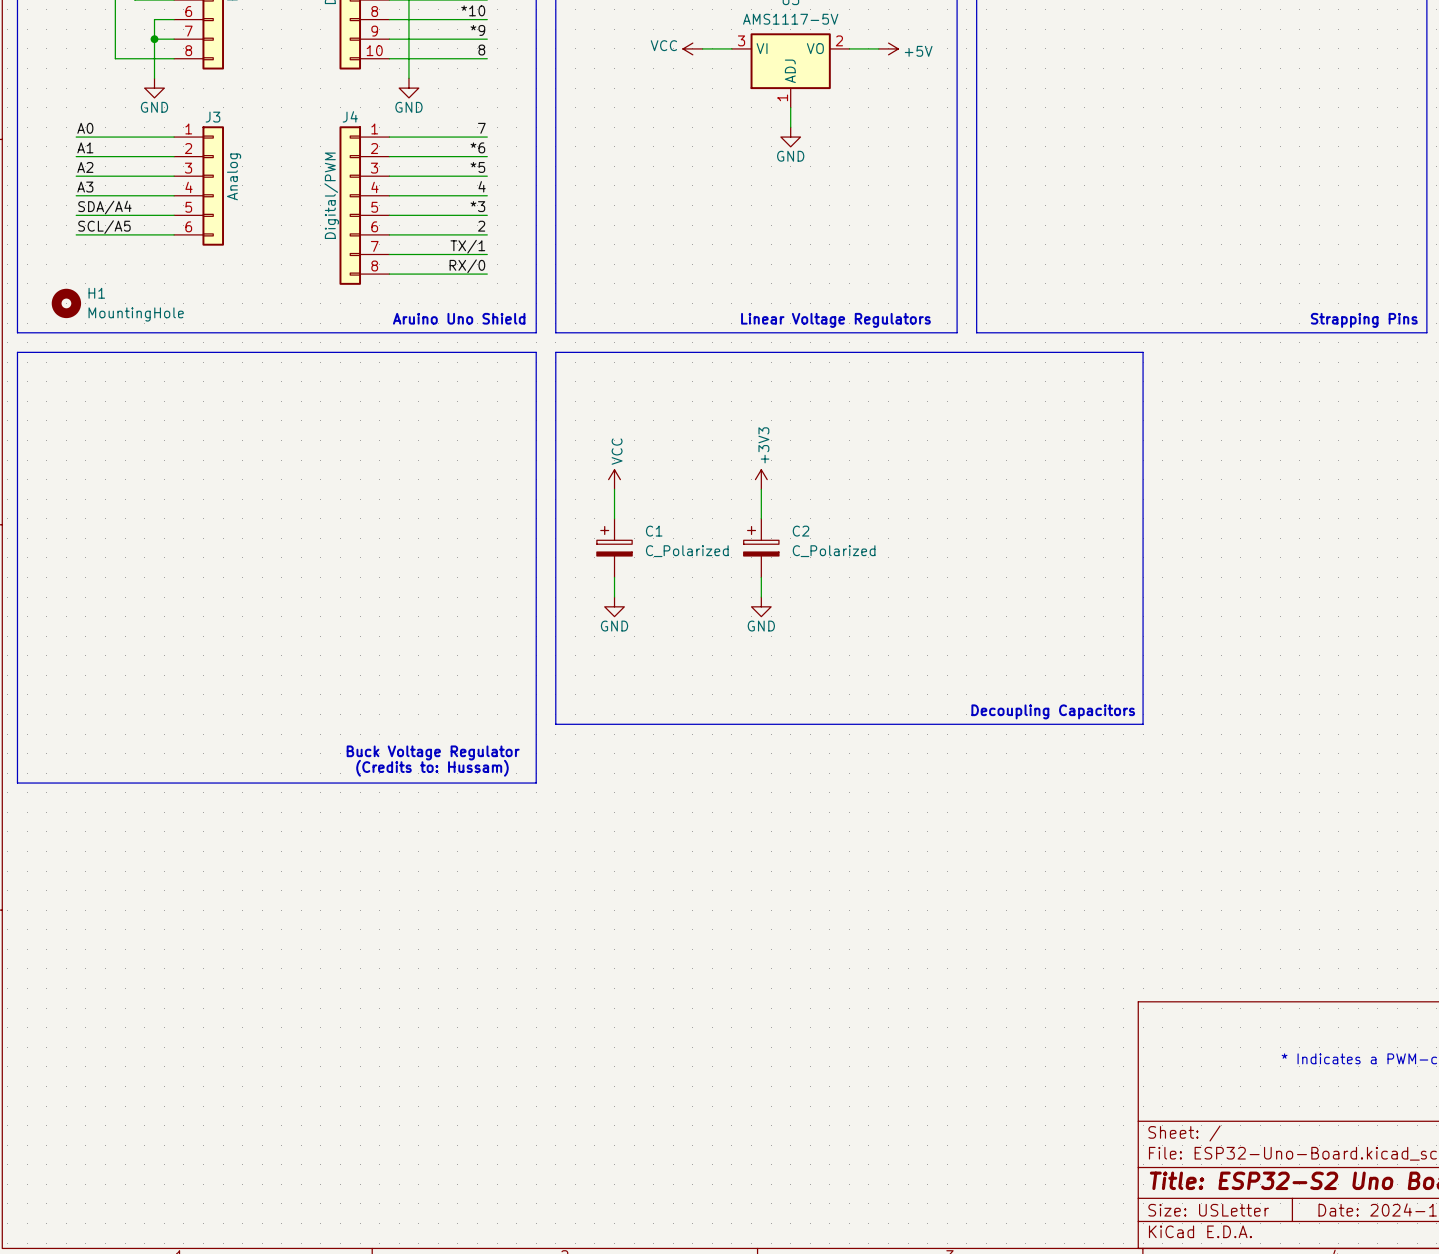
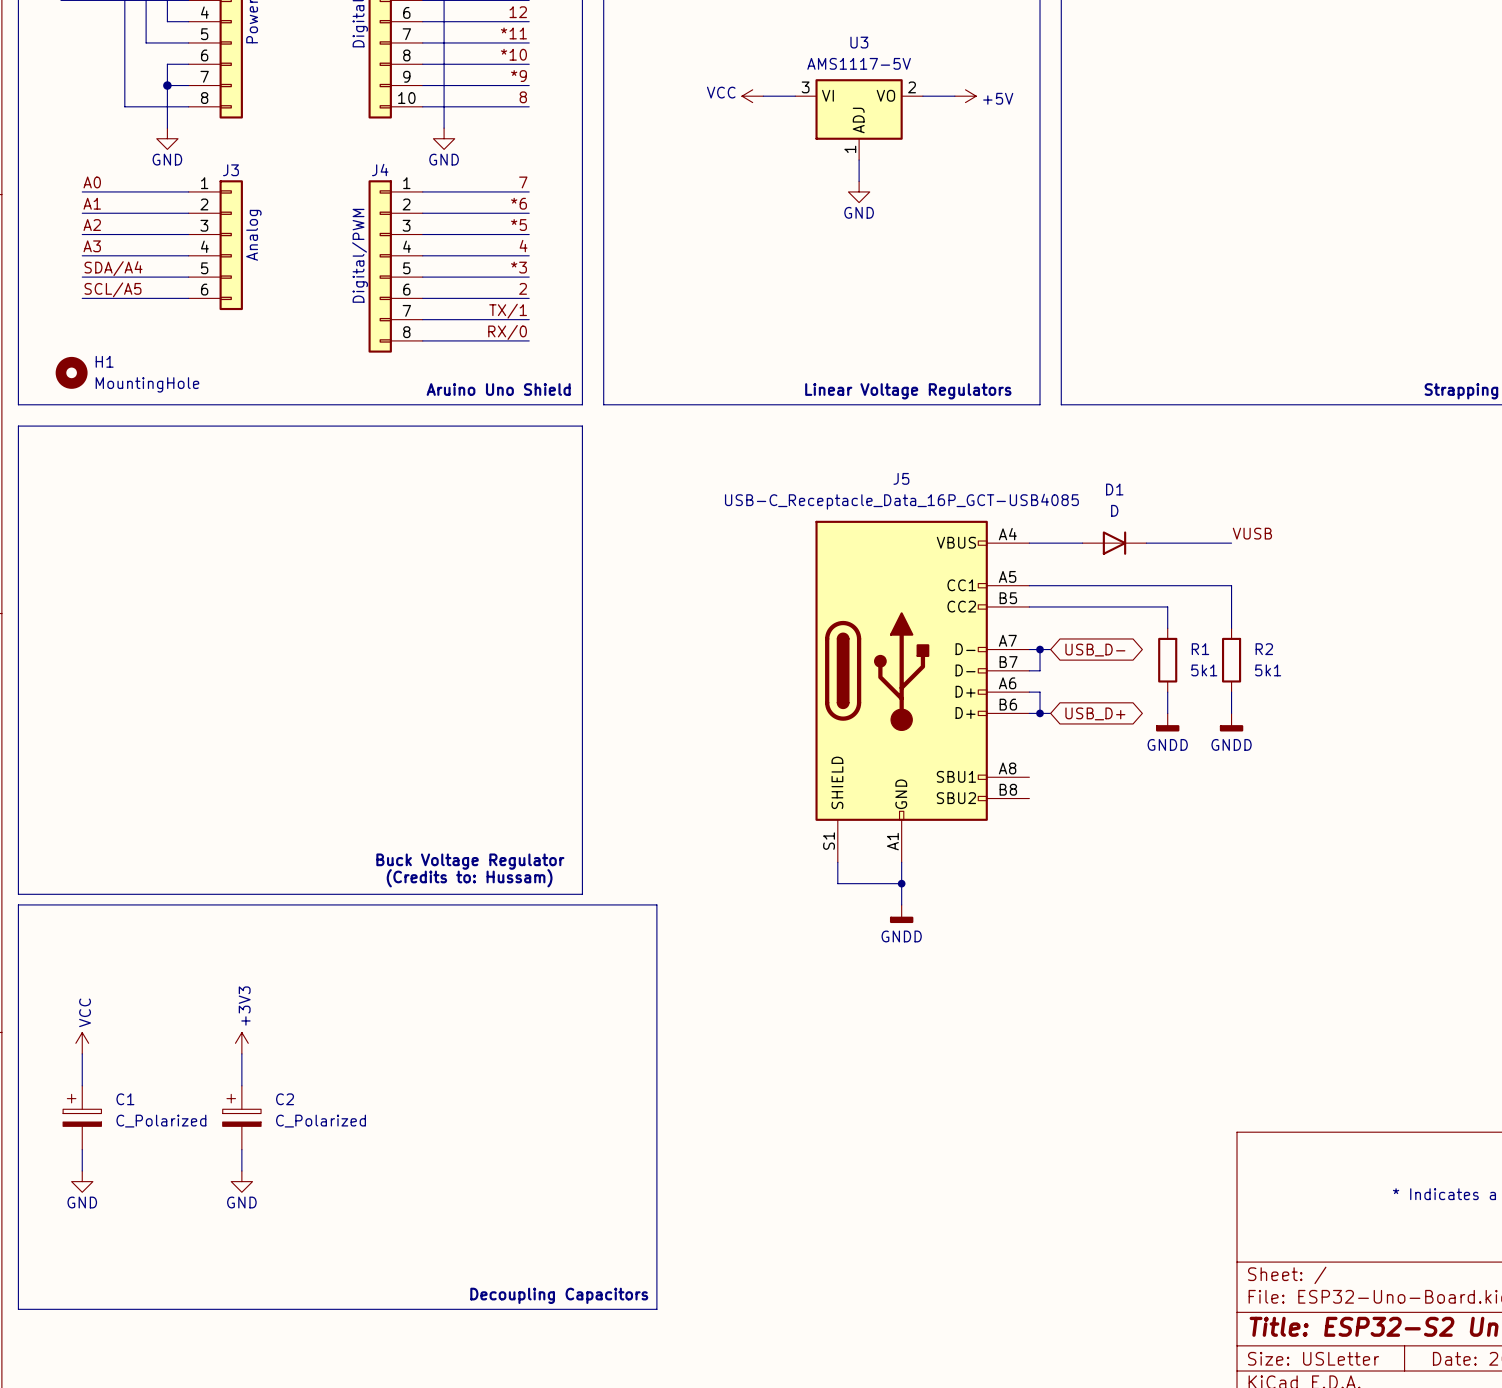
line: (555, 352) (1143, 352) (1143, 724) (555, 724) (555, 352) -> none
label: none -> VUSB (1252, 533)
wire: none -> (1029, 543) (1082, 543)
D1: none -> D (1114, 543)
wire: none -> (1146, 543) (1231, 543)
power symbol: VCC (614, 479) -> none
power symbol: +3V3 (761, 479) -> none
wire: (614, 489) (614, 518) -> none
wire: none -> (1029, 585) (1231, 585) (1231, 628)
wire: none -> (1029, 606) (1167, 606) (1167, 628)
C1 position: (614, 548) -> (82, 1117)
C2 position: (761, 548) -> (241, 1117)
wire: none -> (1029, 649) (1050, 649)
wire: none -> (1040, 649) (1040, 670) (1029, 670)
junction: none -> (1040, 649)
global label: none -> USB_D- (1095, 650)
R1: none -> 5k1 (1167, 660)
R2: none -> 5k1 (1231, 660)
wire: (614, 577) (614, 597) -> none
J5: none -> USB-C_Receptacle_Data_16P_GCT-USB4085 (922, 691)
wire: none -> (1029, 692) (1040, 692) (1040, 713)
wire: none -> (1167, 692) (1167, 713)
wire: none -> (1231, 692) (1231, 713)
power symbol: GND (614, 606) -> none
power symbol: GND (761, 606) -> none
wire: none -> (1029, 713) (1050, 713)
junction: none -> (1040, 713)
global label: none -> USB_D+ (1095, 713)
power symbol: none -> GNDD (1167, 722)
power symbol: none -> GNDD (1231, 722)
text: Decoupling Capacitors (1053, 711) -> none
wire: none -> (837, 862) (837, 883) (901, 883)
wire: none -> (901, 862) (901, 904)
junction: none -> (901, 883)
line: none -> (18, 904) (18, 1309) (656, 1309) (656, 904) (18, 904)
power symbol: none -> GNDD (901, 913)
power symbol: none -> VCC (82, 1043)
power symbol: none -> +3V3 (241, 1043)
wire: none -> (82, 1053) (82, 1085)
wire: none -> (241, 1053) (241, 1085)
wire: none -> (82, 1149) (82, 1170)
wire: none -> (241, 1149) (241, 1170)
power symbol: none -> GND (82, 1181)
power symbol: none -> GND (241, 1181)
text: none -> Decoupling Capacitors (559, 1295)

